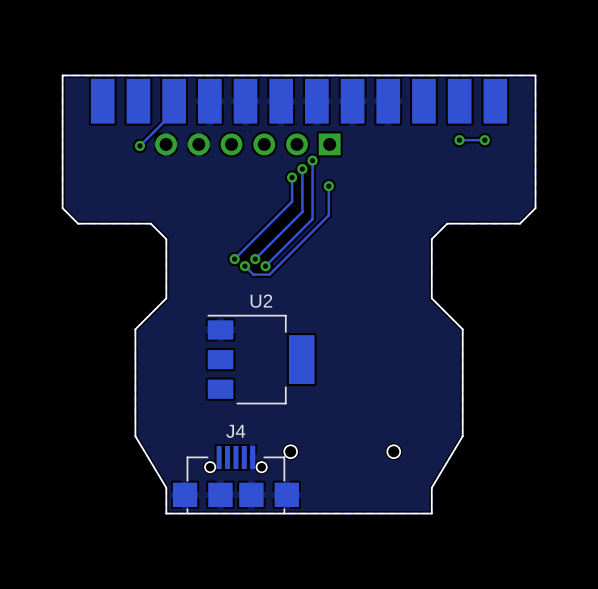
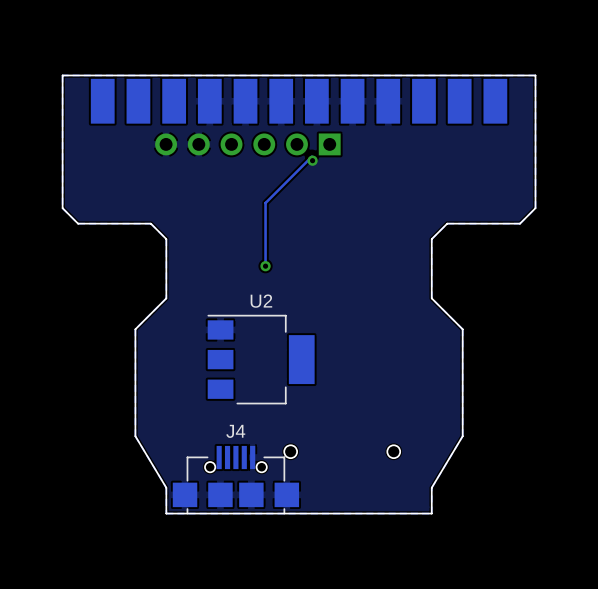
track: (174, 101) (174, 111) (139, 145) -> none
via: (459, 140) -> none
track: (484, 140) (459, 140) -> none
via: (484, 140) -> none
via: (139, 145) -> none
track: (312, 160) (312, 219) (265, 266) -> (311, 156) (265, 203) (265, 266)
track: (302, 169) (302, 211) (255, 259) -> none
via: (302, 169) -> none
track: (292, 177) (292, 201) (234, 259) -> none
via: (292, 177) -> none
track: (328, 186) (328, 215) (269, 274) (253, 274) (244, 266) -> none
via: (328, 186) -> none
via: (234, 259) -> none
via: (255, 259) -> none
via: (244, 266) -> none

